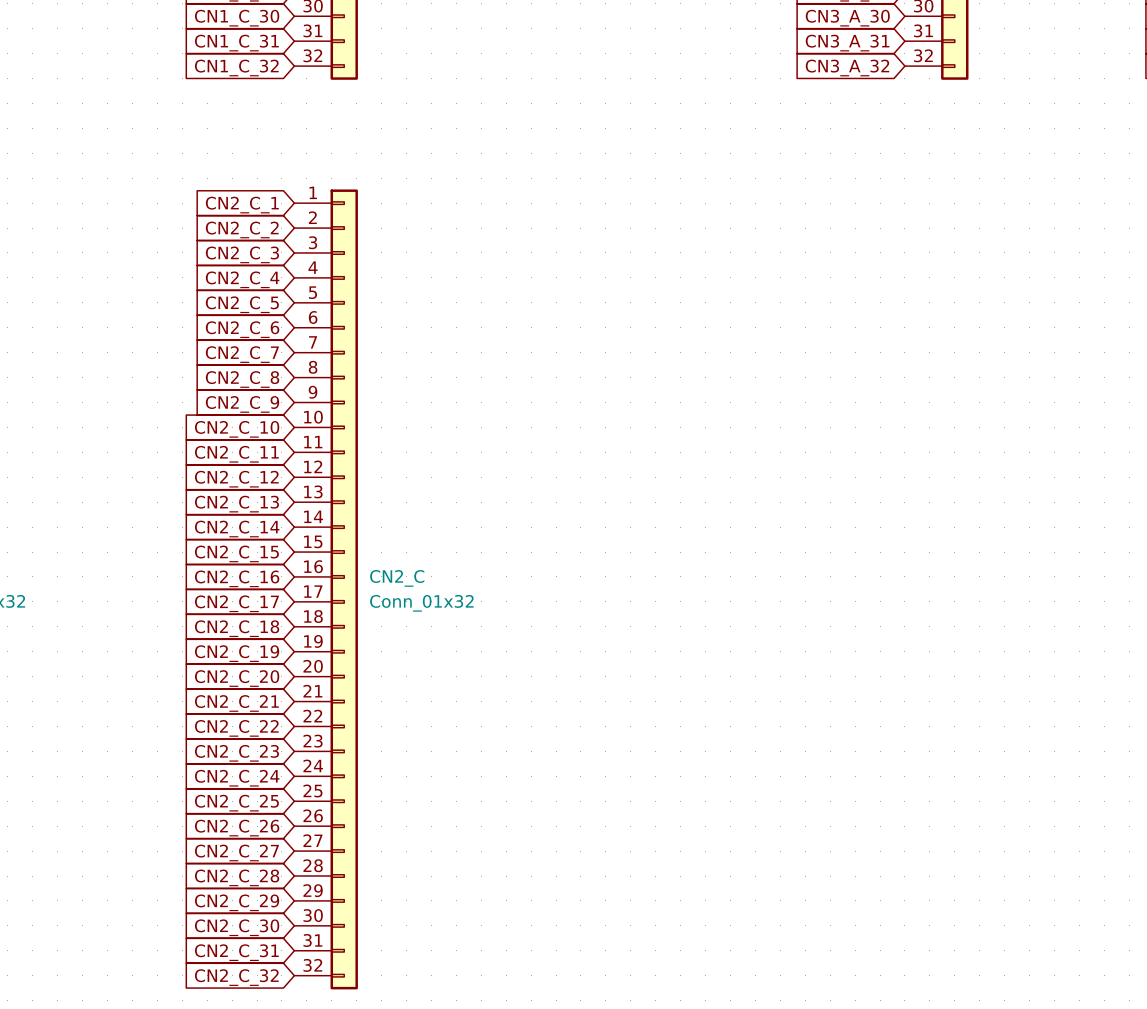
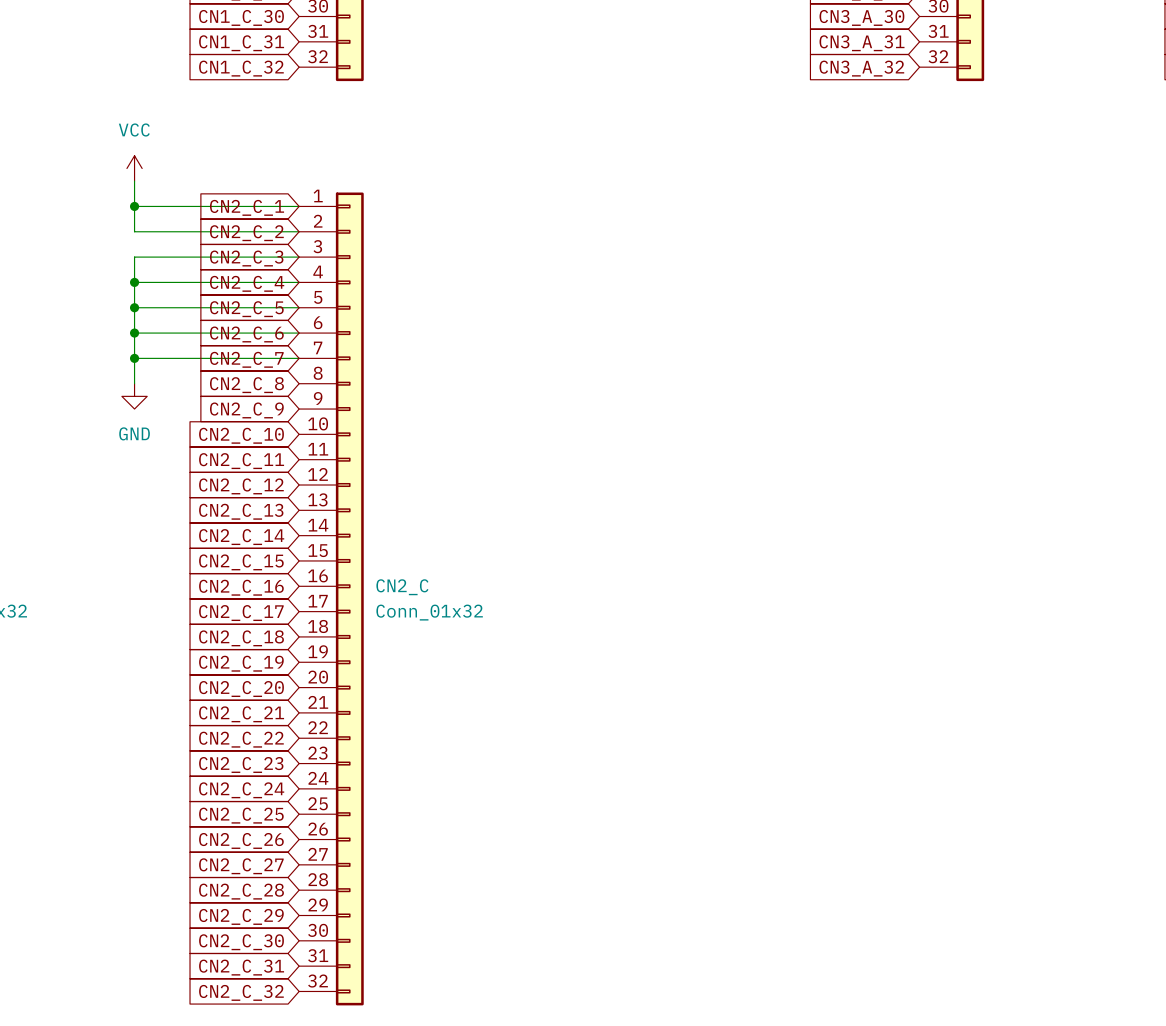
power symbol: none -> VCC (134, 168)
wire: none -> (134, 181) (134, 231) (299, 231)
wire: none -> (134, 206) (299, 206)
junction: none -> (134, 206)
wire: none -> (299, 257) (134, 257) (134, 383)
wire: none -> (134, 282) (299, 282)
junction: none -> (134, 282)
wire: none -> (134, 307) (299, 307)
junction: none -> (134, 307)
wire: none -> (134, 333) (299, 333)
junction: none -> (134, 333)
wire: none -> (134, 358) (299, 358)
junction: none -> (134, 358)
power symbol: none -> GND (134, 396)

